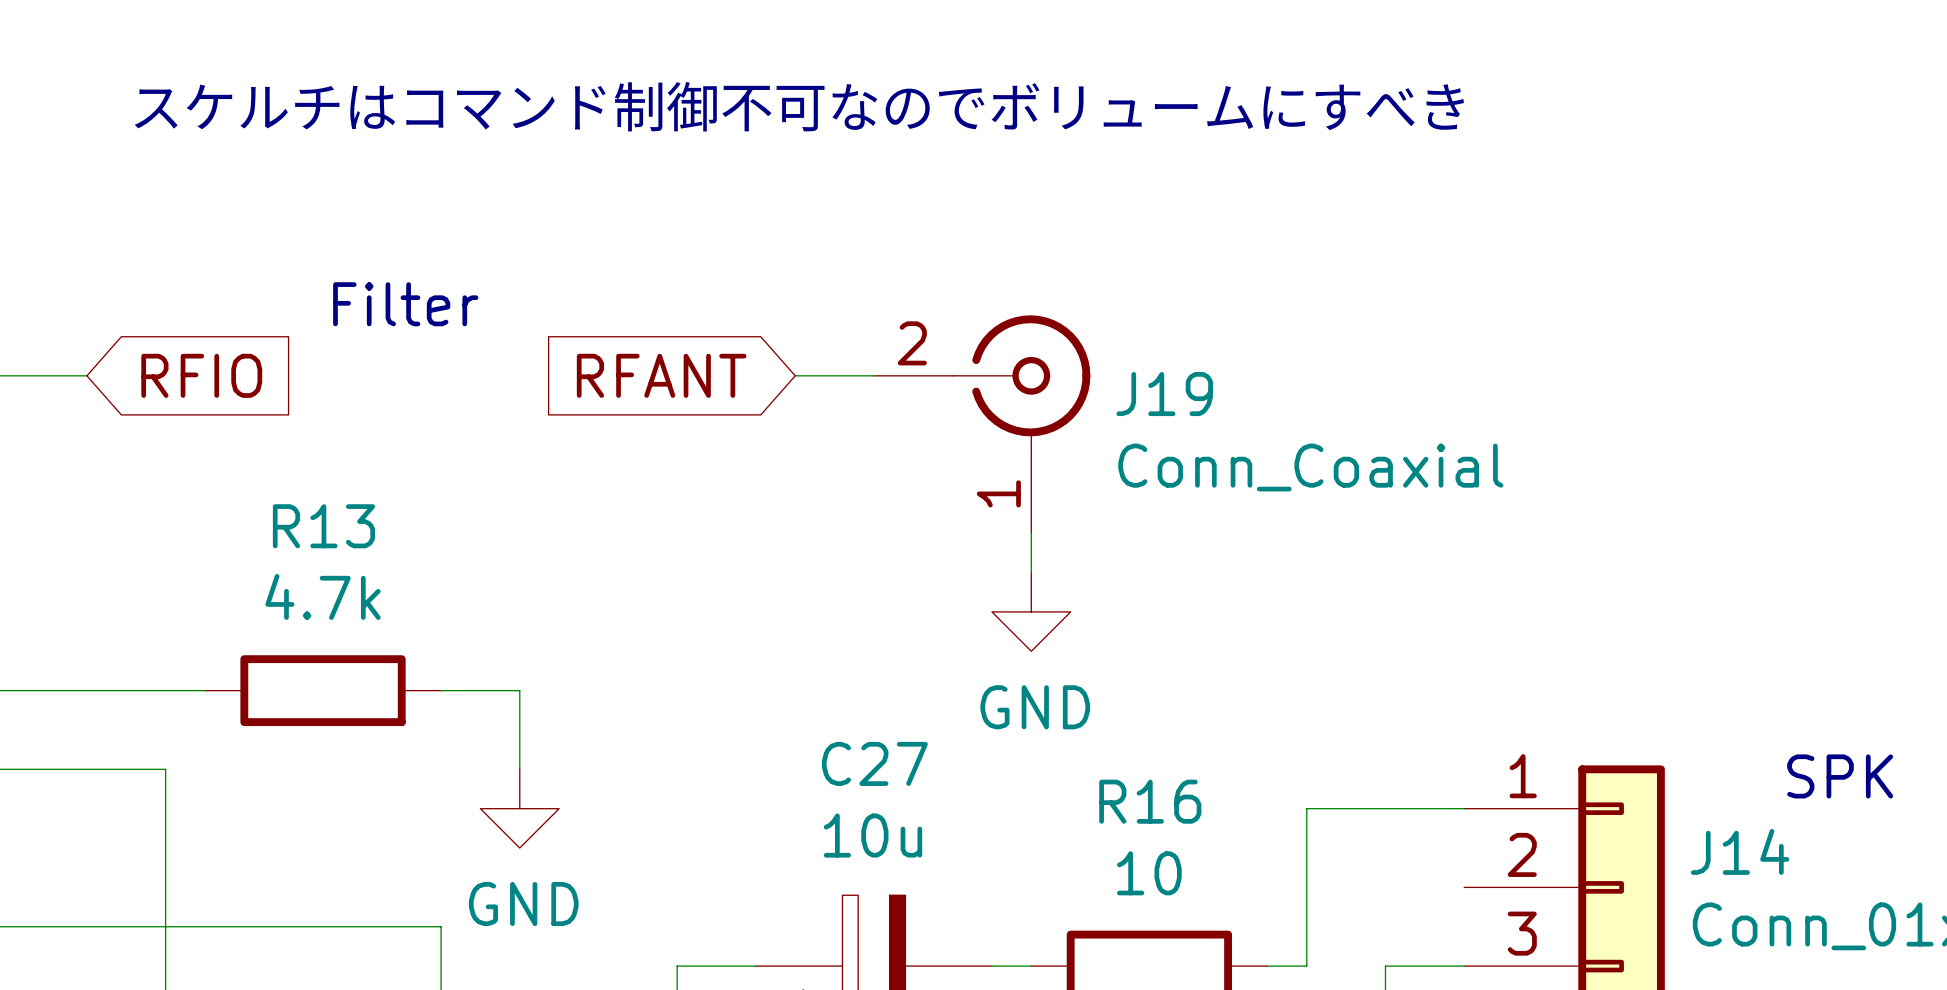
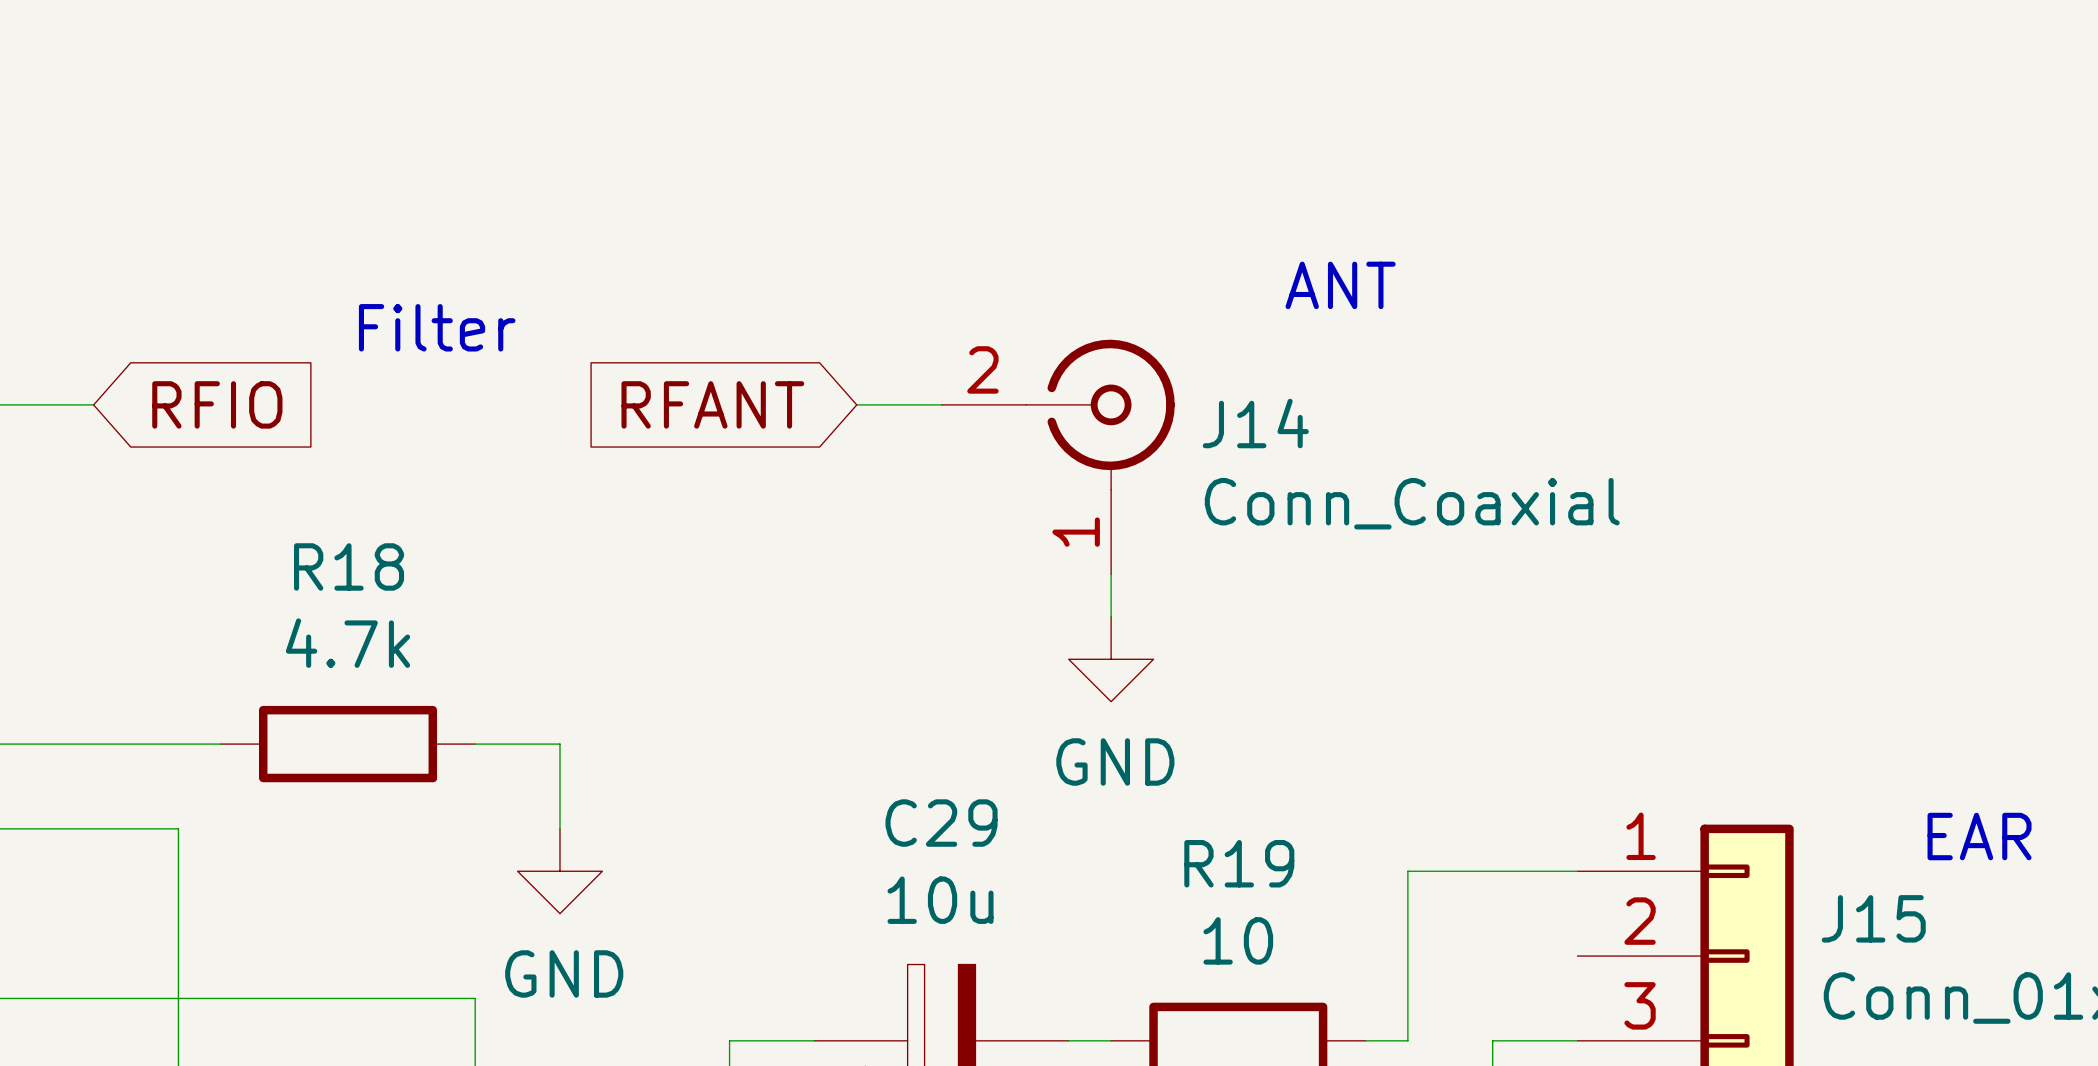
text: スケルチはコマンド制御不可なのでボリュームにすべき (799, 106) -> none
text: none -> ANT (1340, 285)
J19 name: J19 (1164, 394) -> J14 (1255, 423)
R13 name: R13 (323, 526) -> R18 (349, 566)
C27 name: C27 (874, 763) -> C29 (941, 823)
text: SPK (1840, 776) -> EAR (1979, 836)
R16 name: R16 (1150, 801) -> R19 (1239, 863)
J14 name: J14 (1740, 851) -> J15 (1873, 918)

